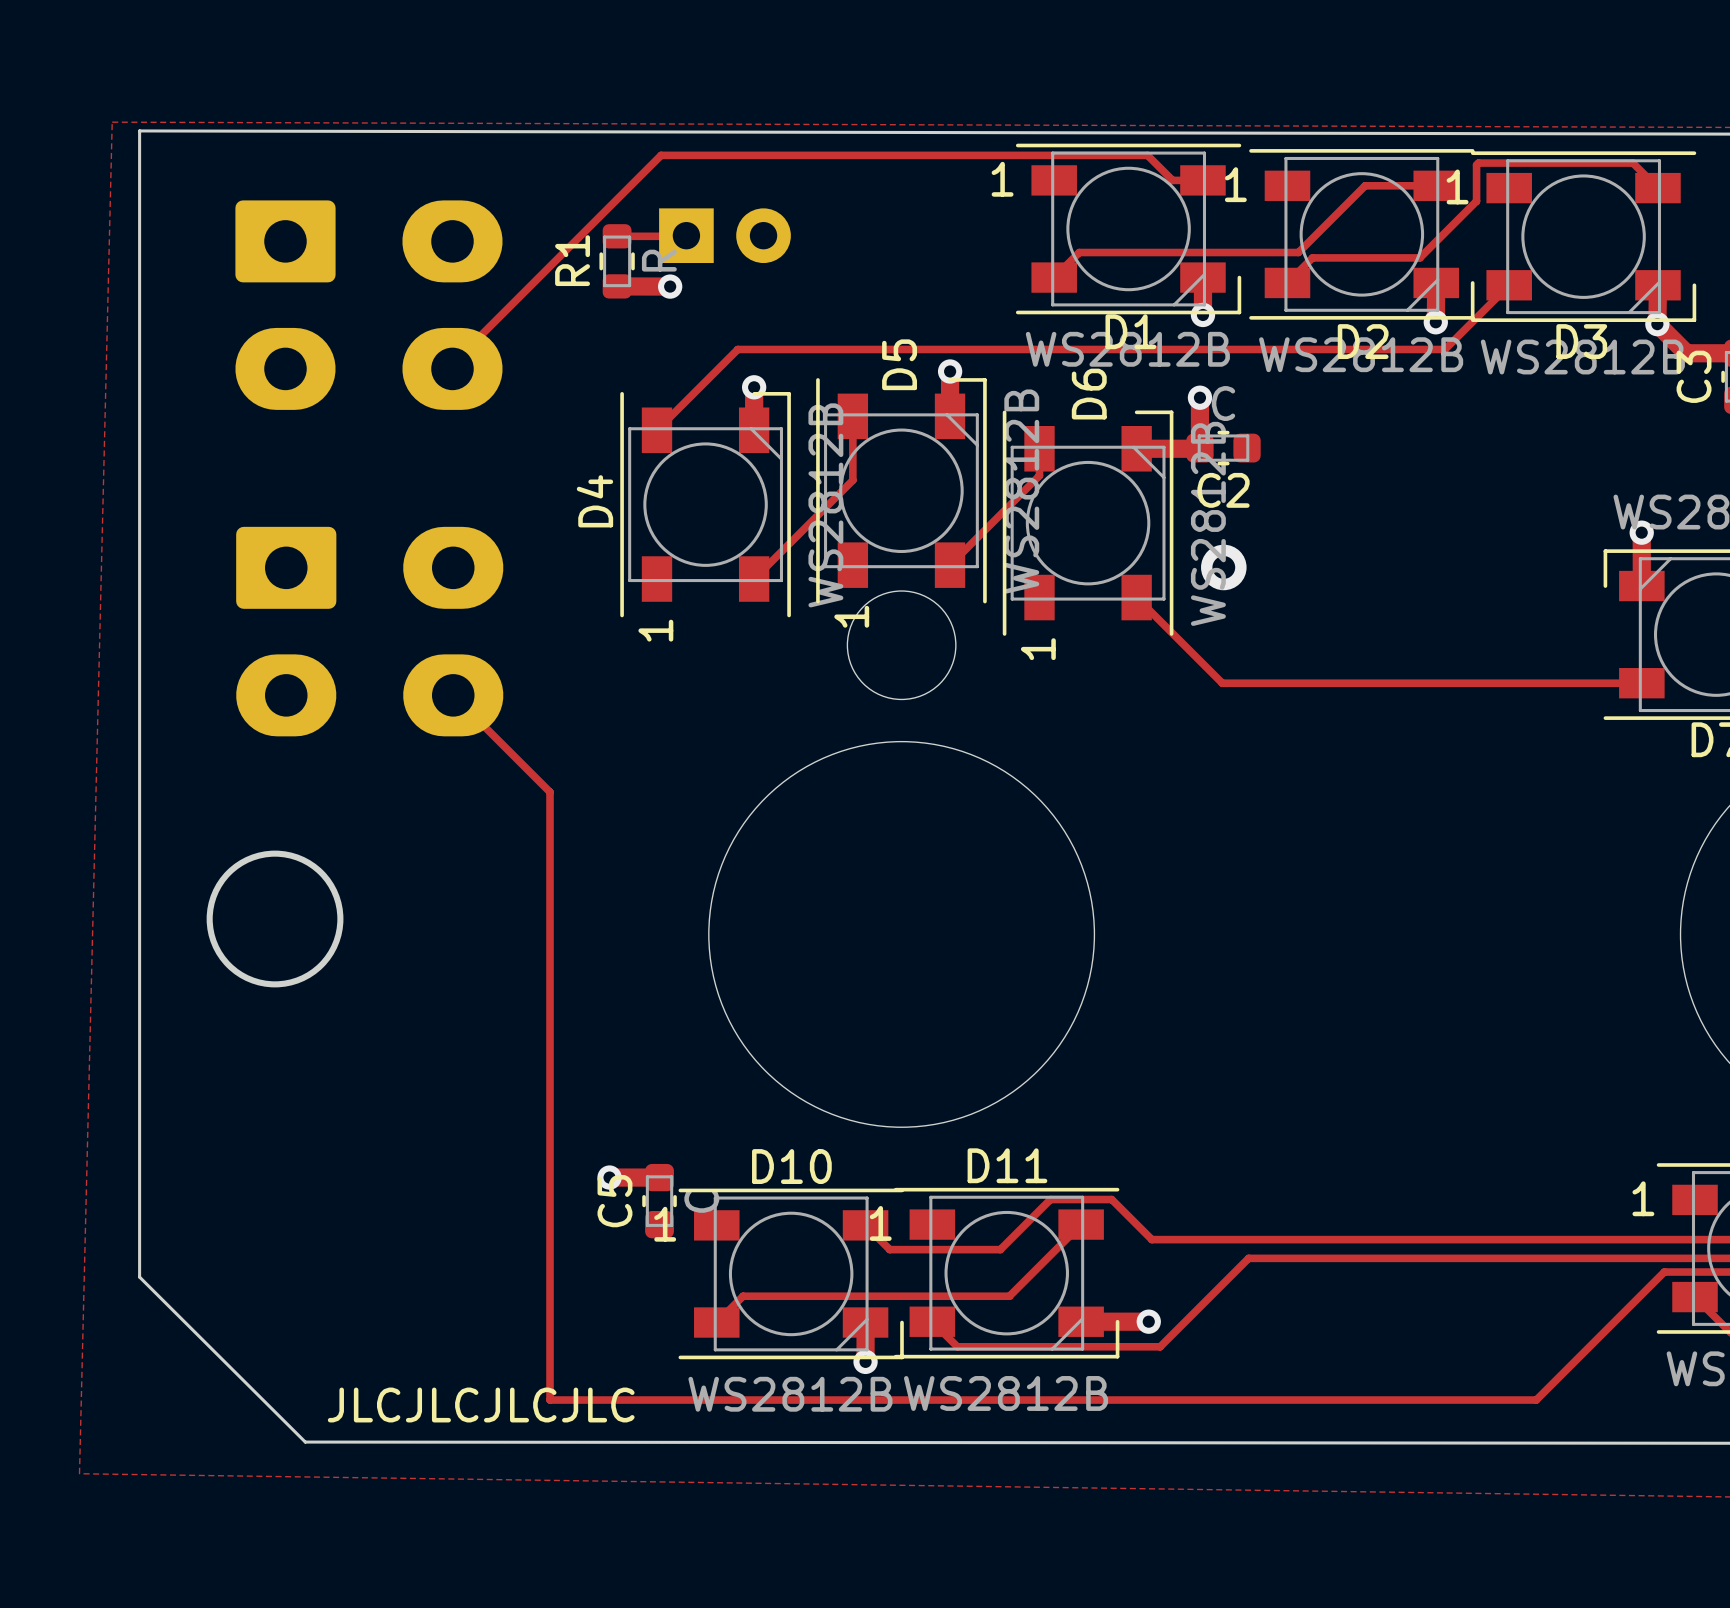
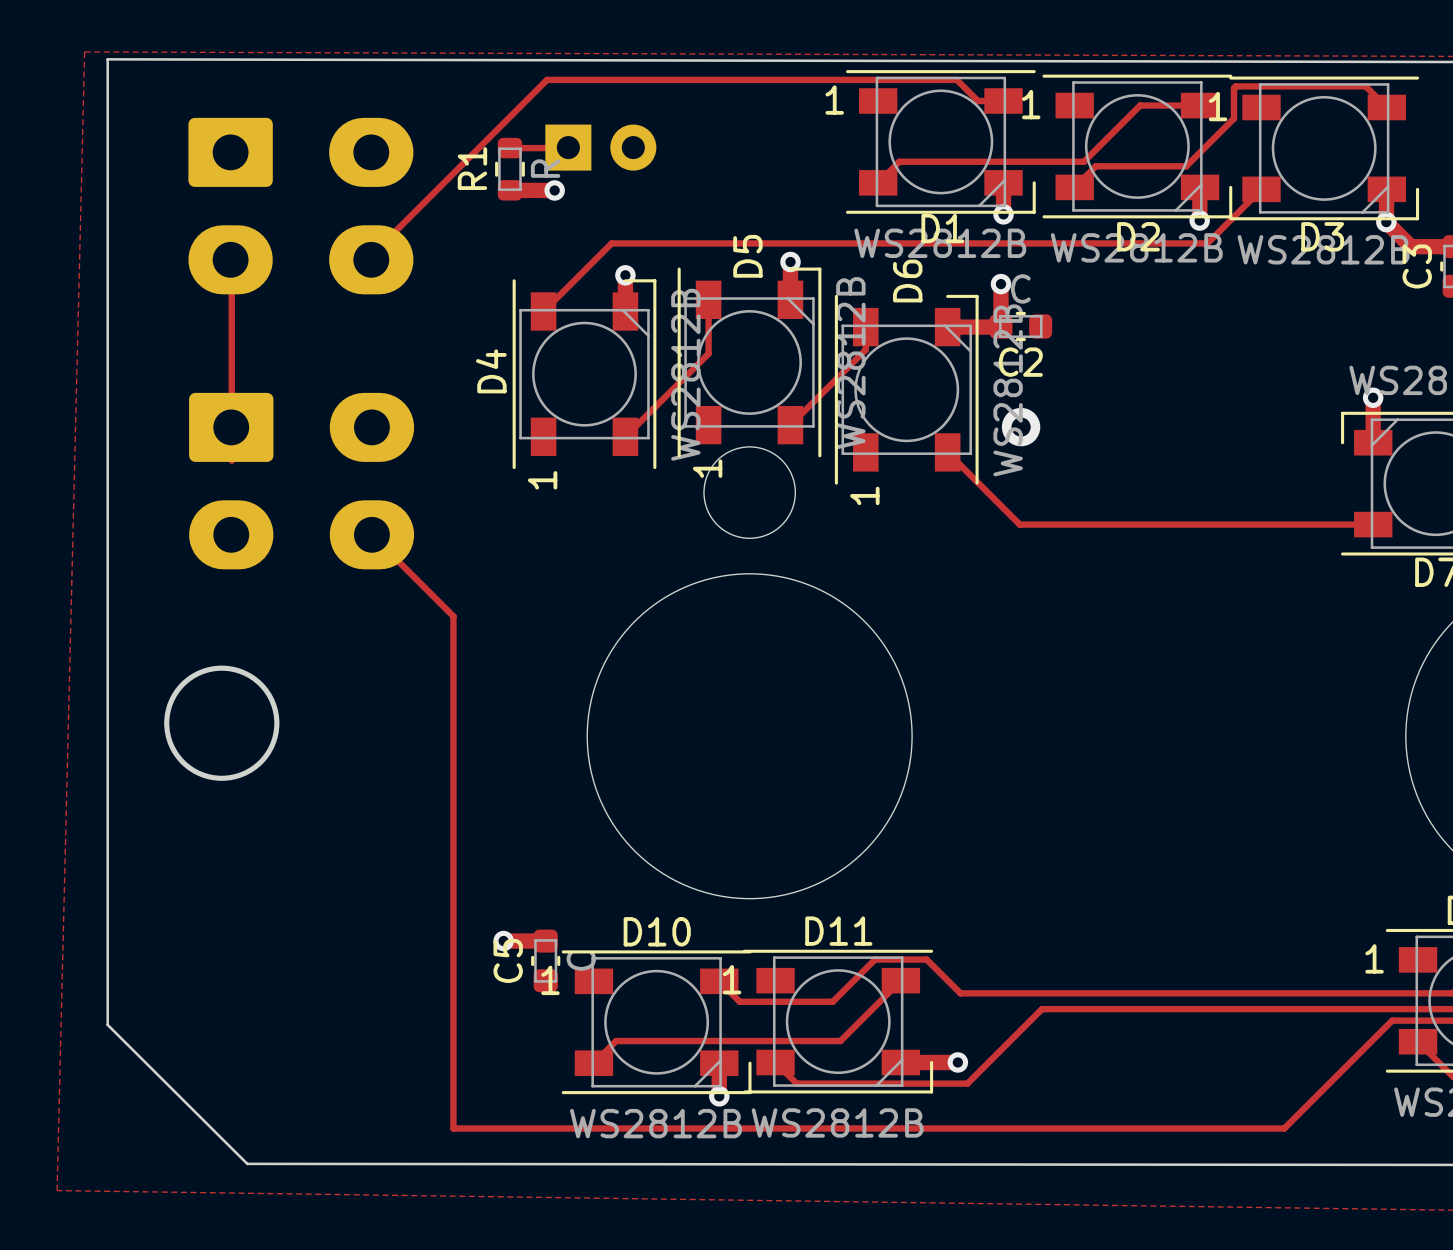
track: none -> (231, 283) (231, 460)
text: JLCJLCJLCJLC (481, 1405) -> none

